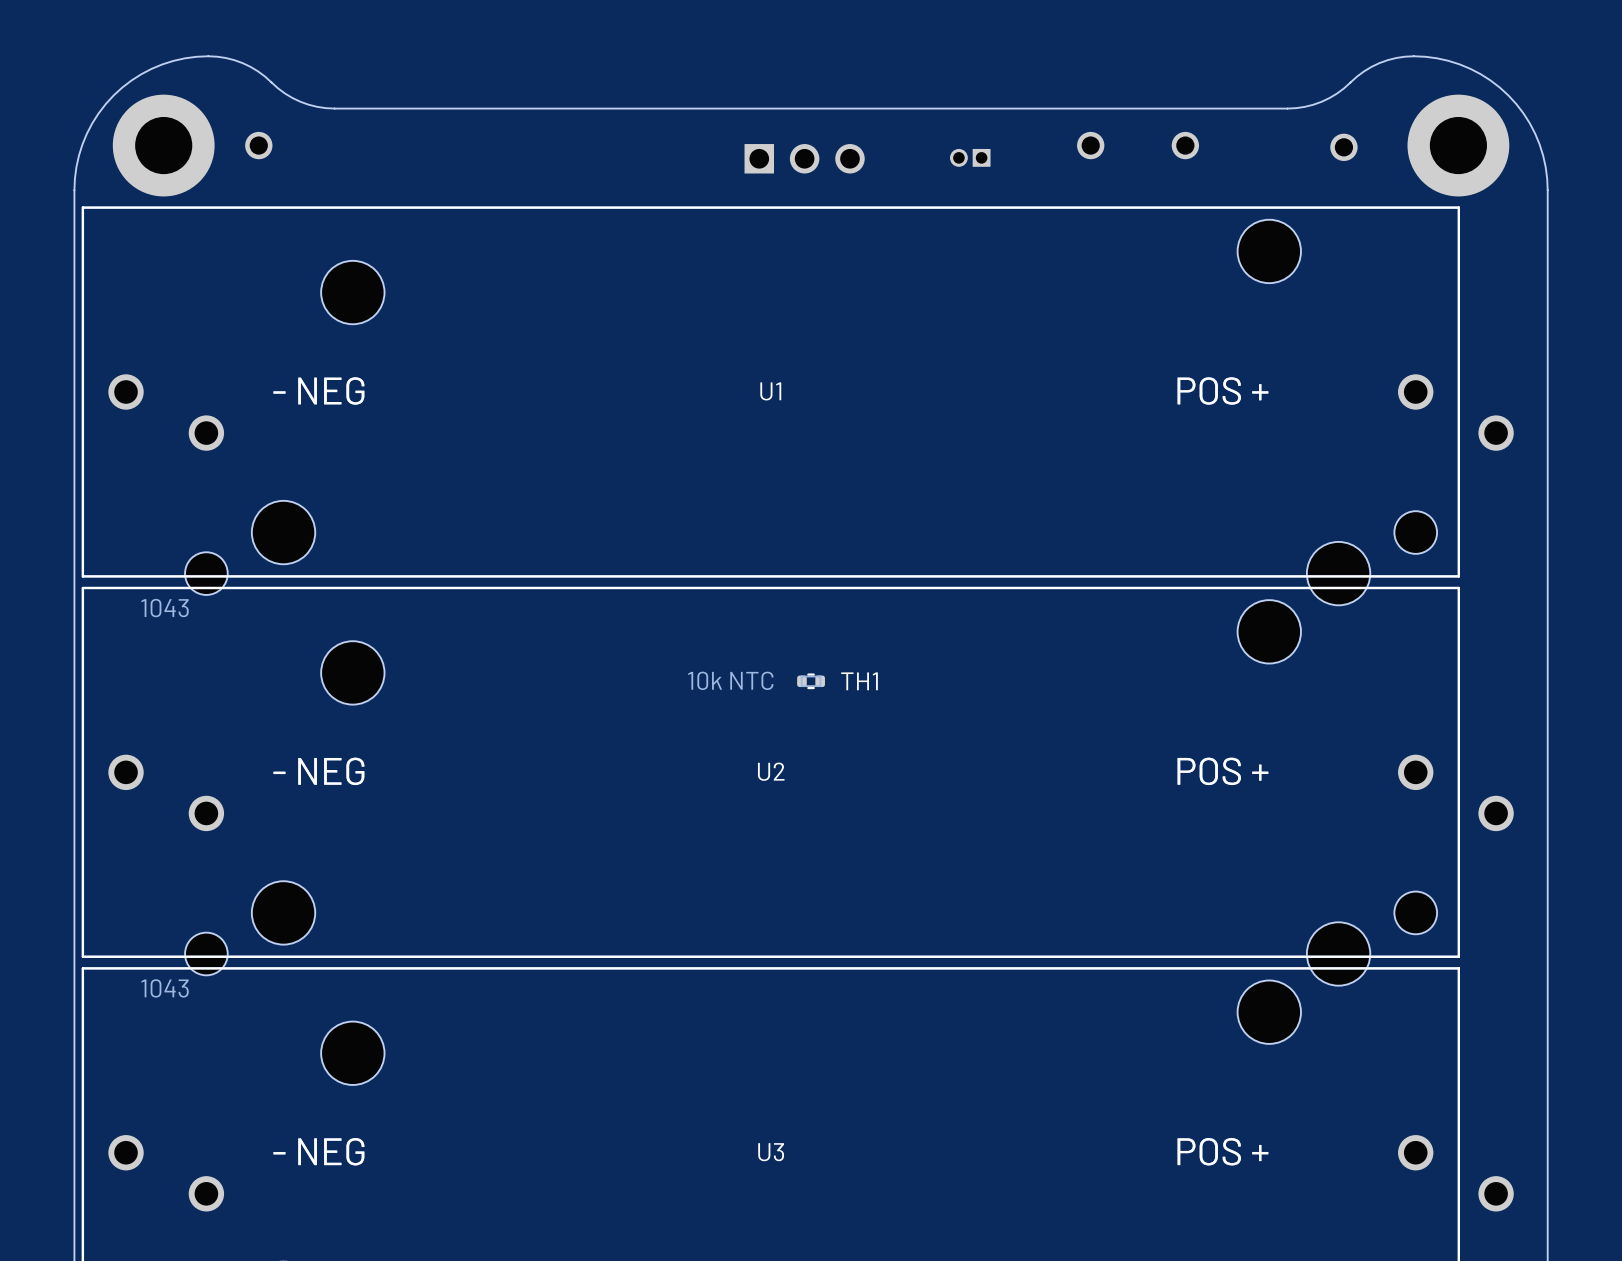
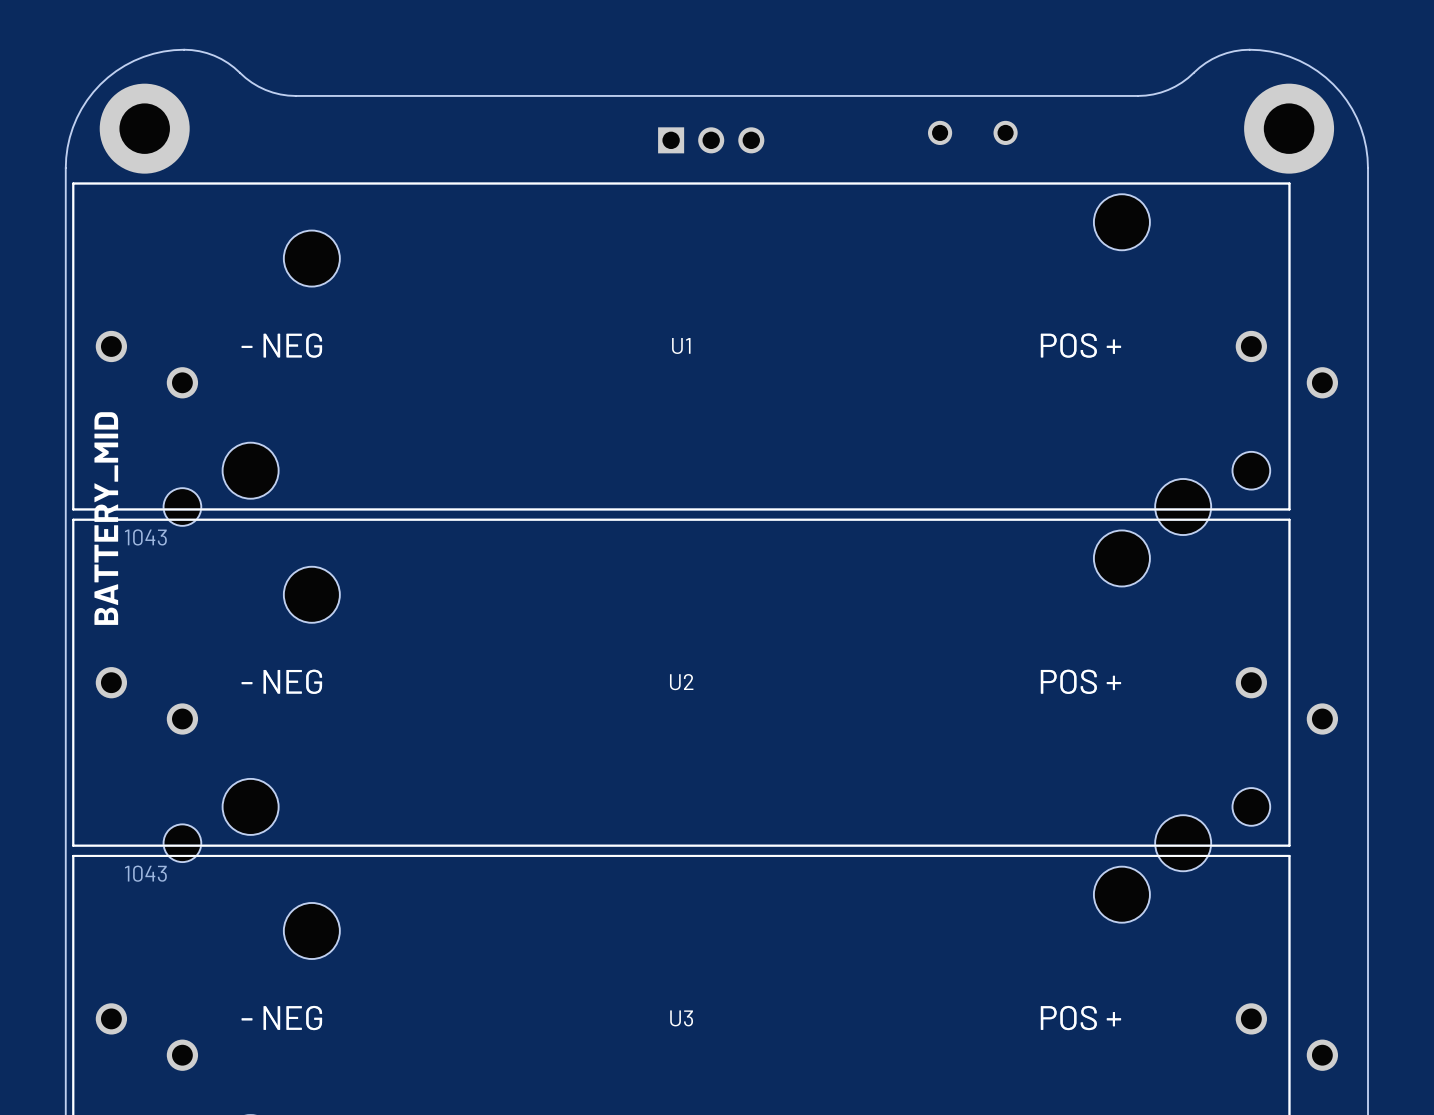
part: (258, 145) -> none
part: (1090, 145) -> none
part: (1185, 145) -> none
part: (1343, 147) -> none
part: none -> (940, 132)
part: none -> (1005, 132)
part: (970, 157) -> none
text: none -> BATTERY_MID (106, 518)
TH1: 10k NTC (811, 681) -> none

